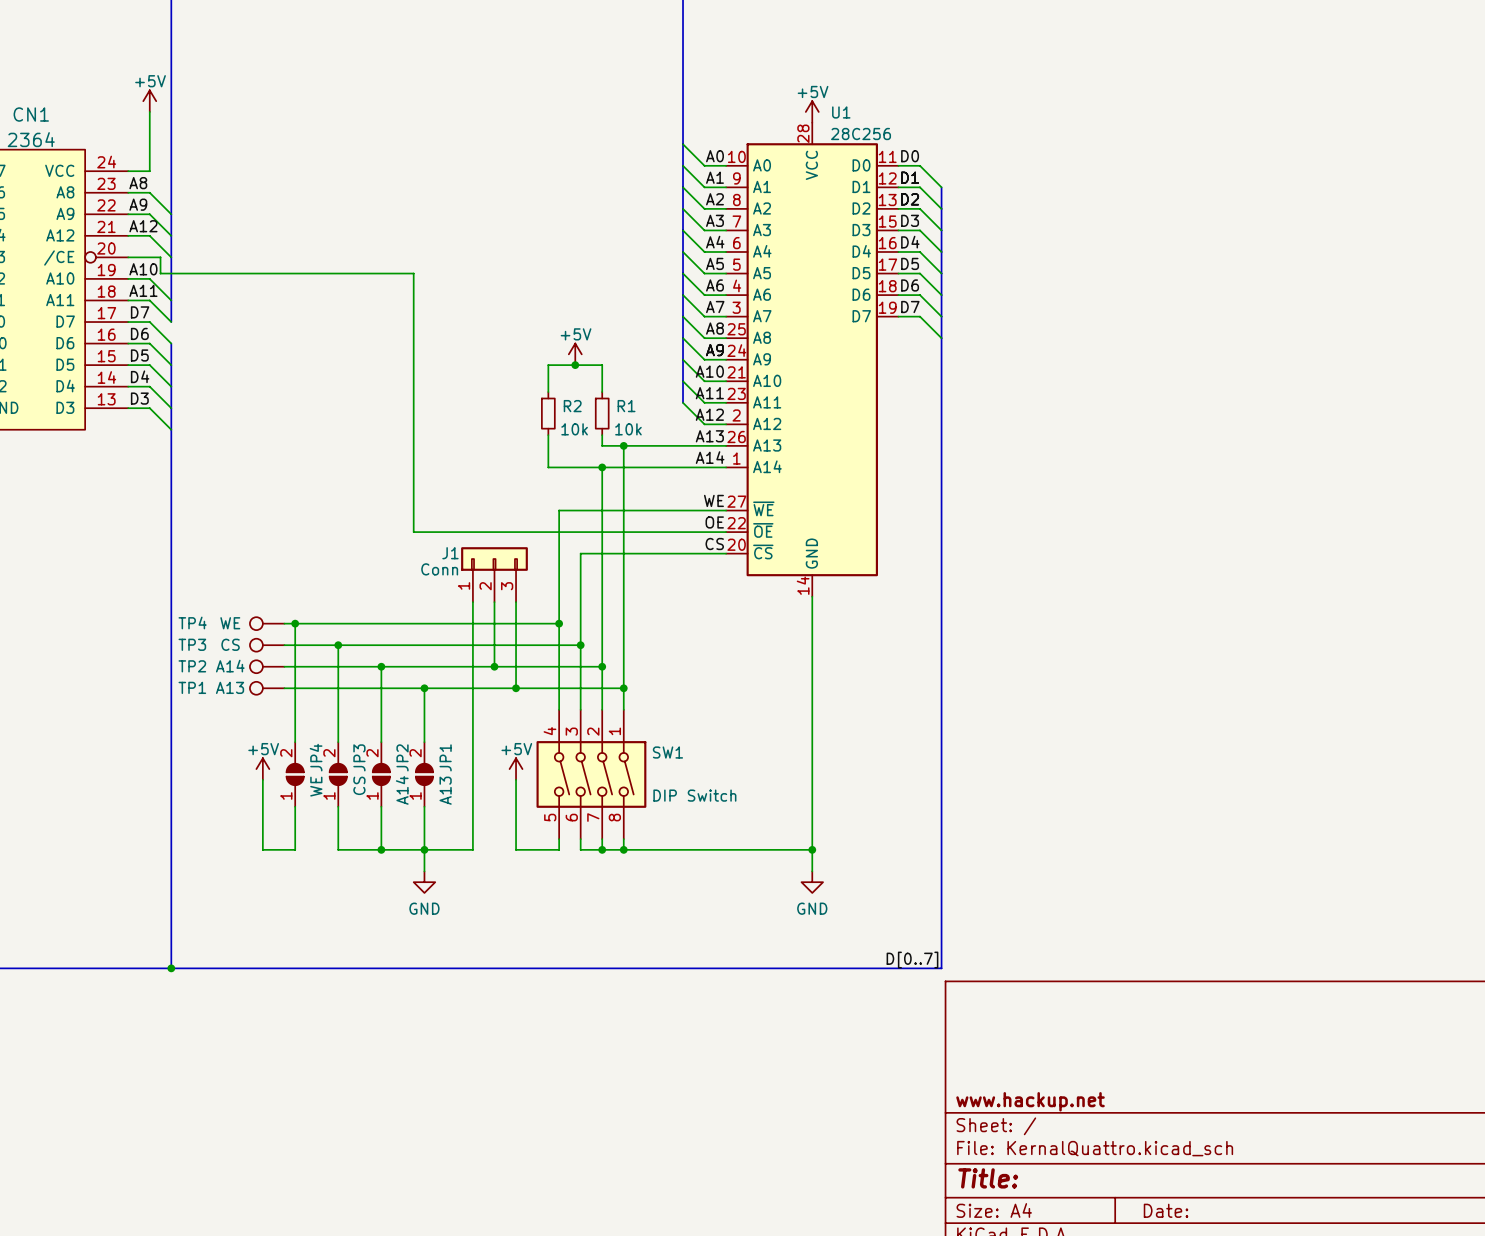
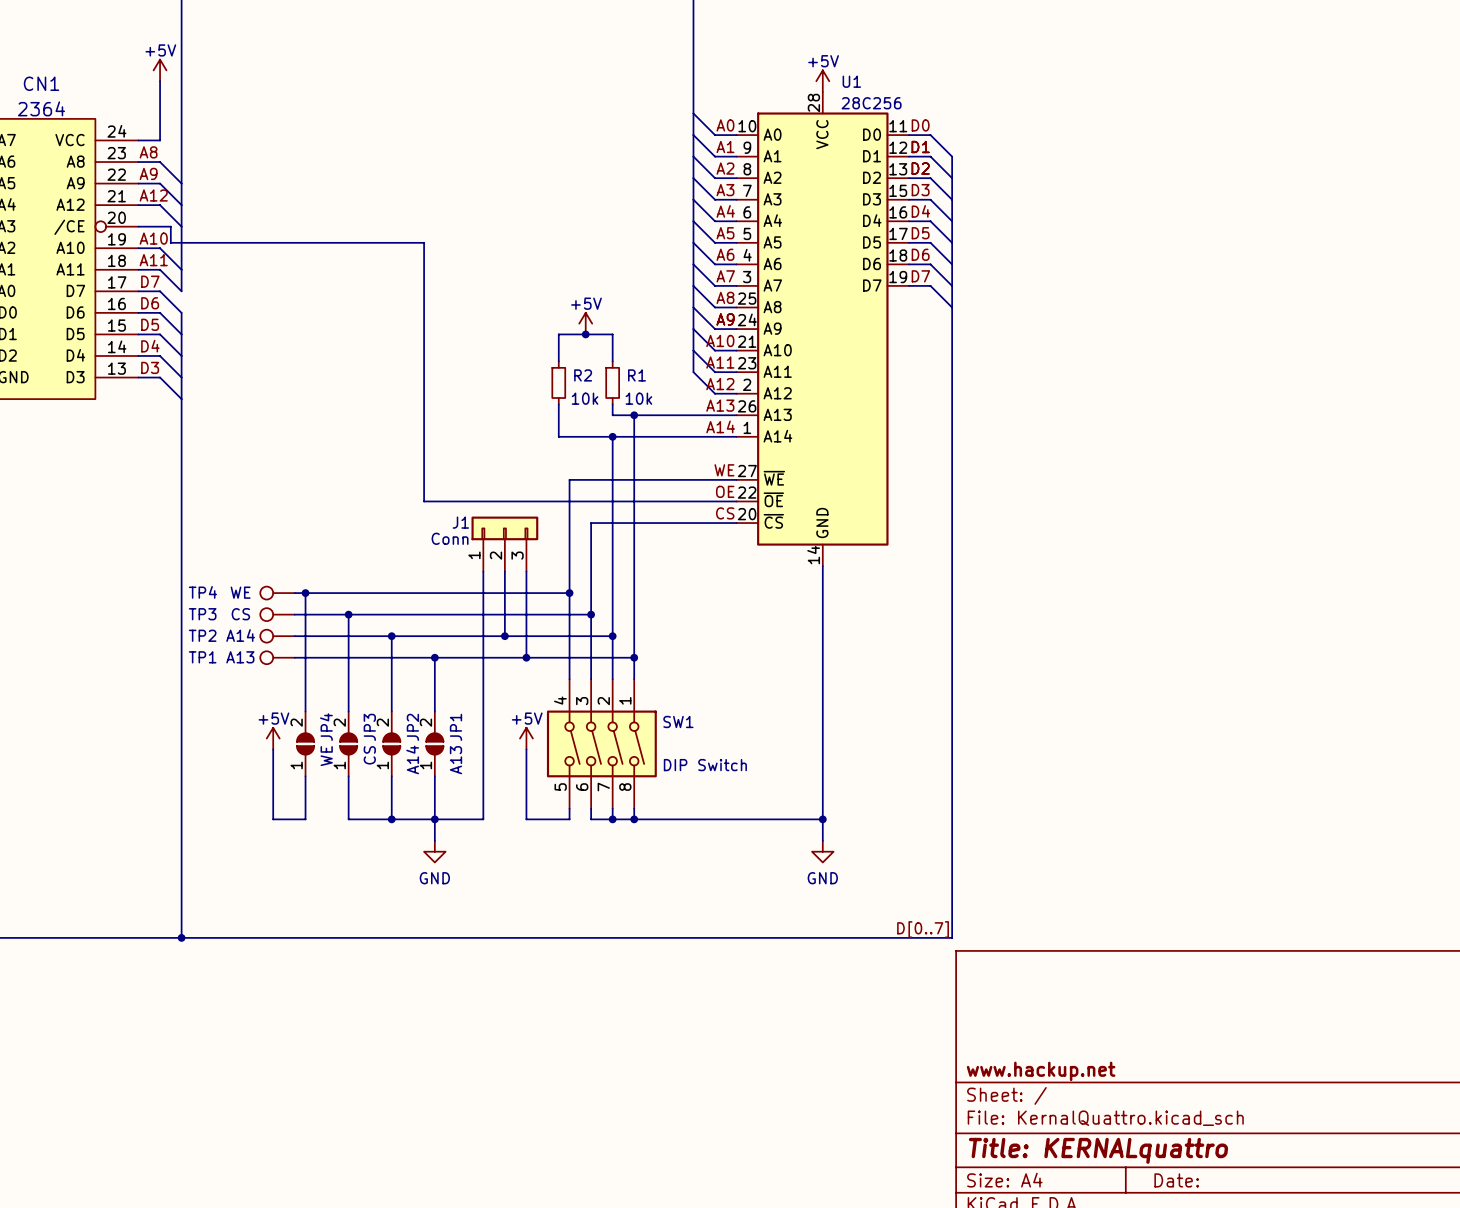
title block: Title: (988, 1178) -> Title: KERNALquattro (1098, 1150)

